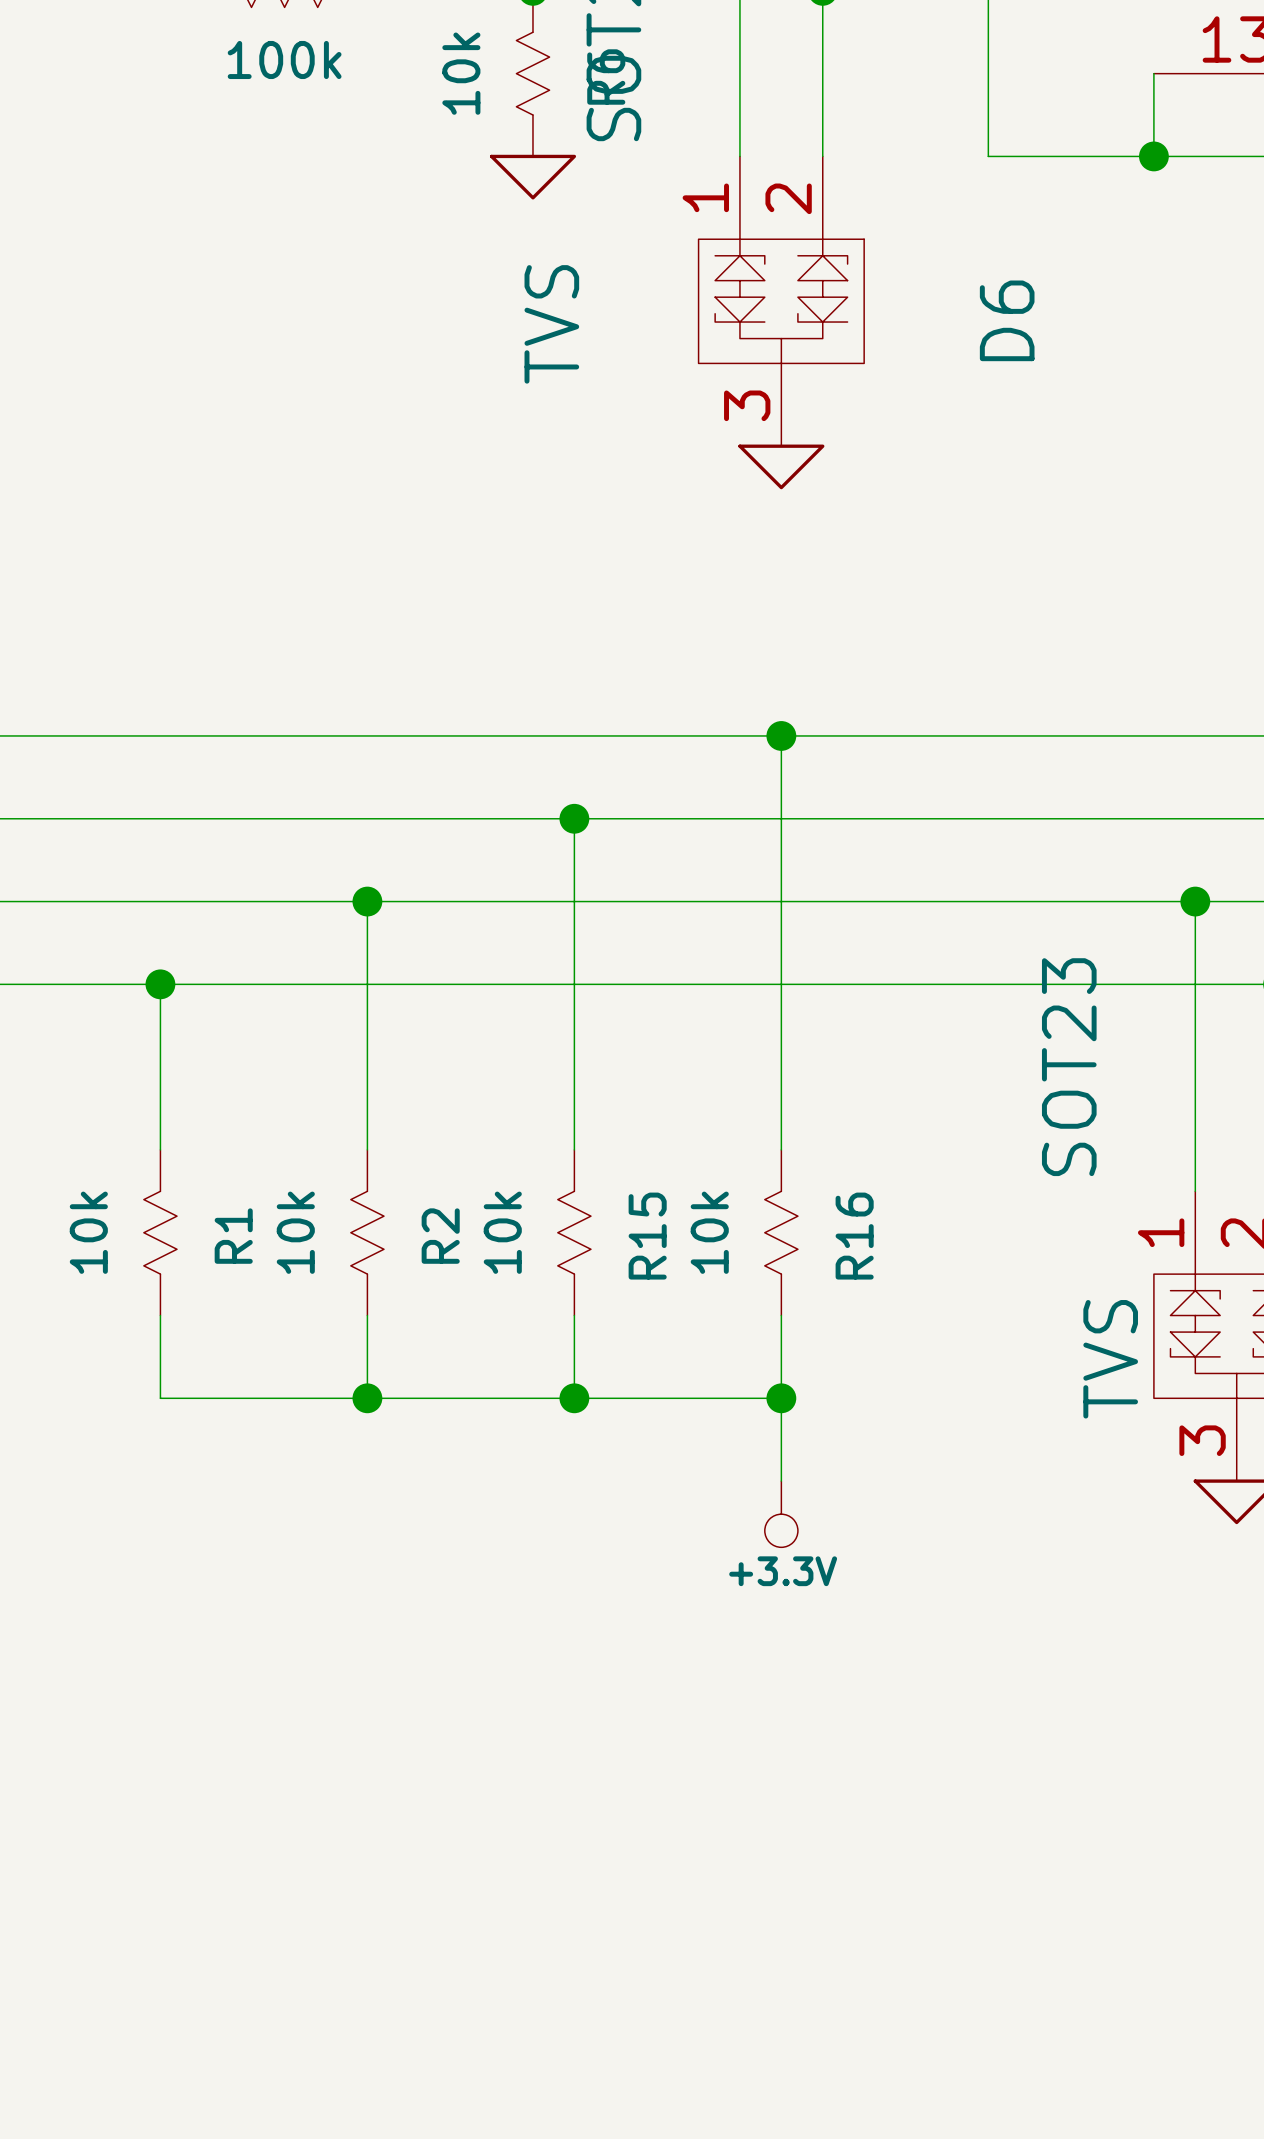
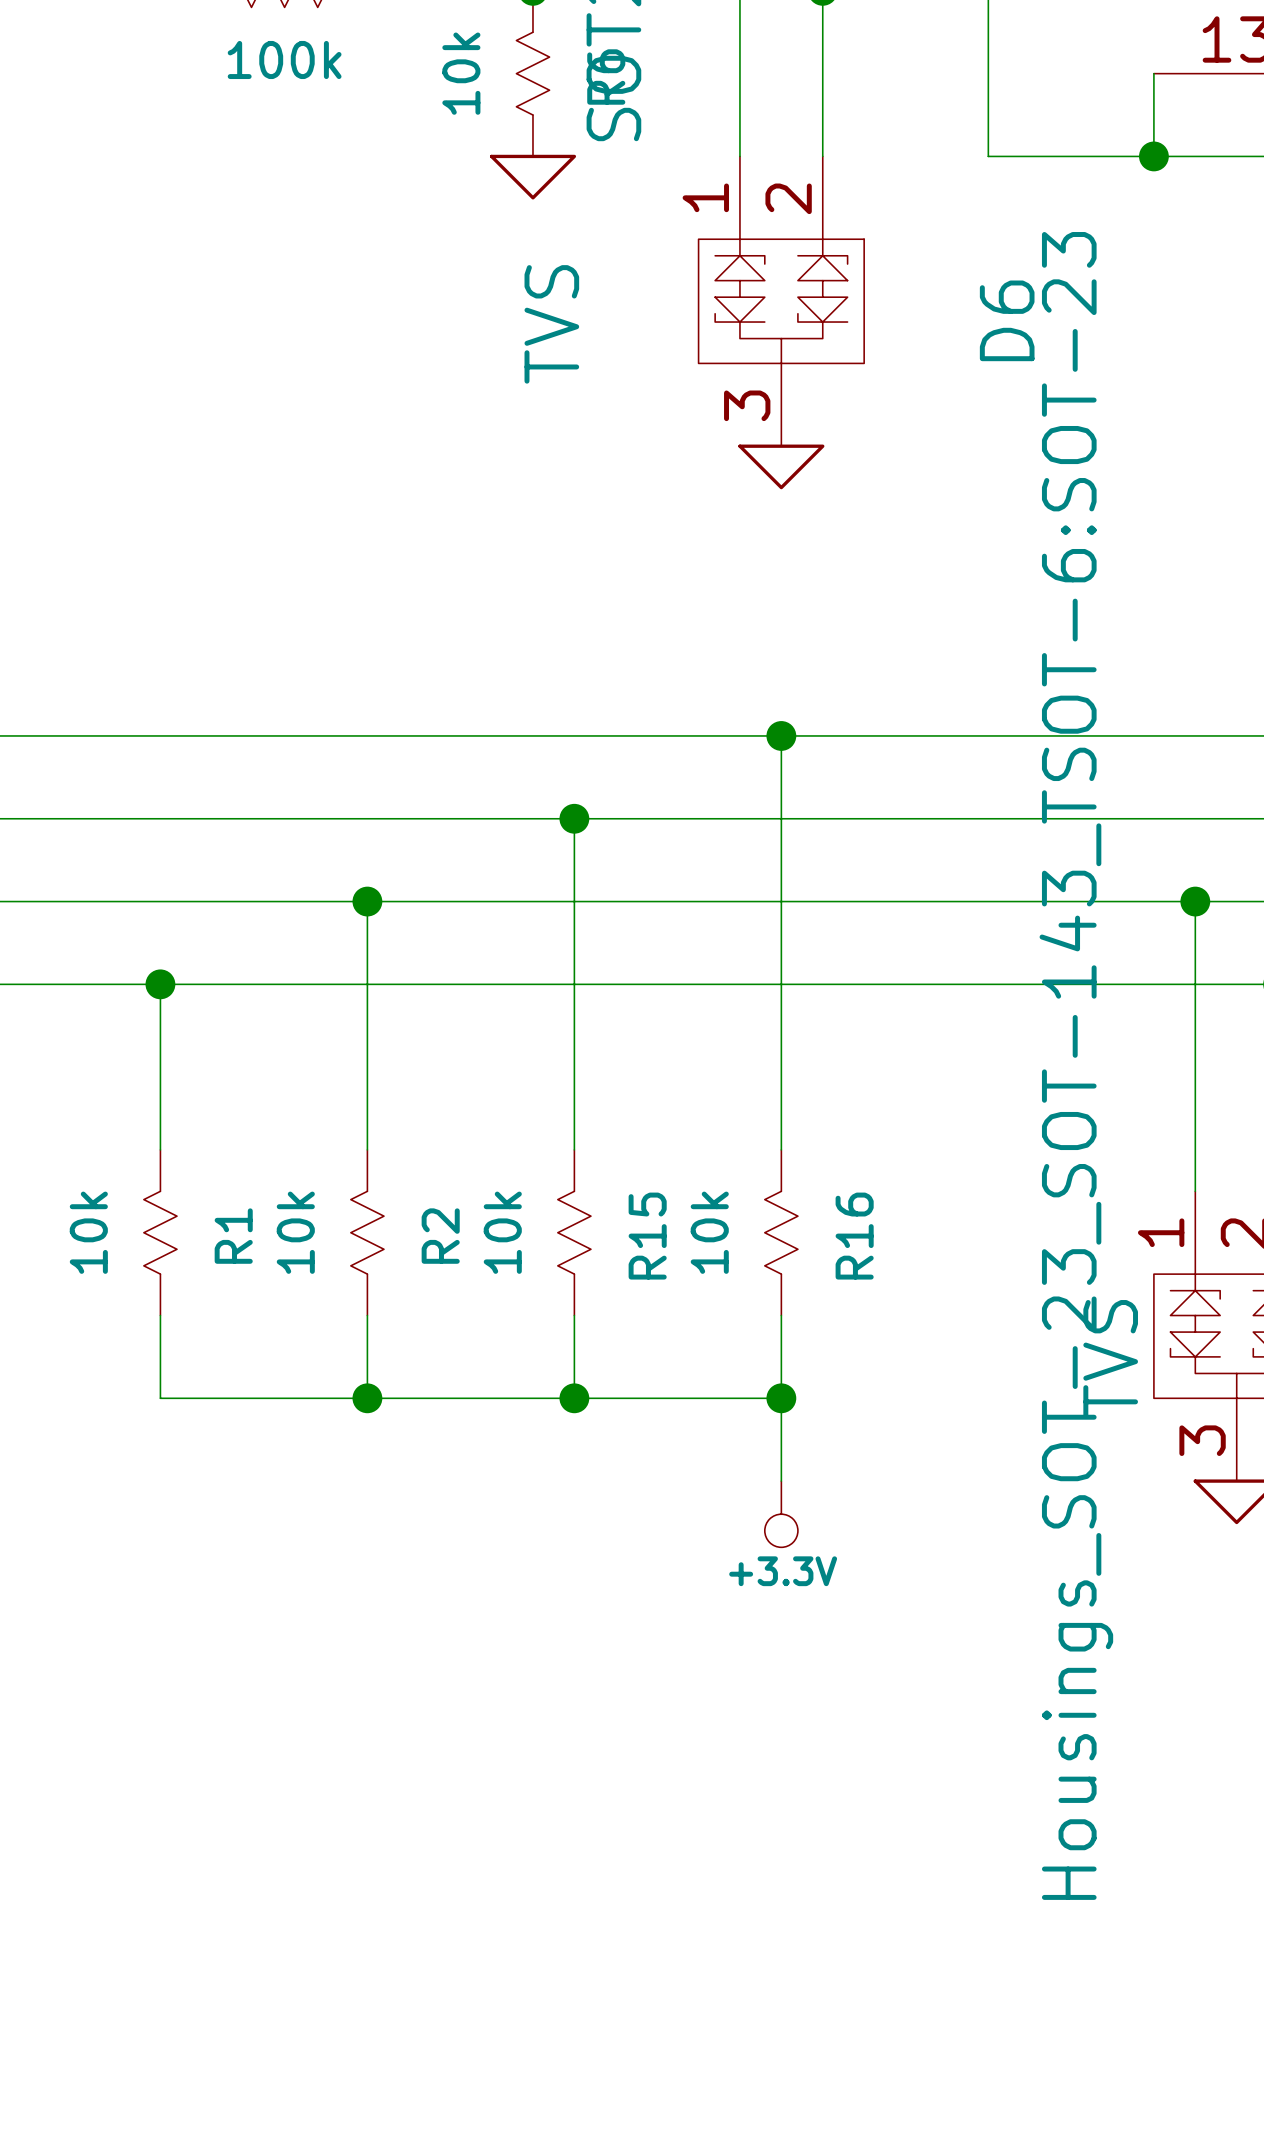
part text: SOT23 (1069, 1067) -> Housings_SOT-23_SOT-143_TSOT-6:SOT-23 (1076, 1065)

